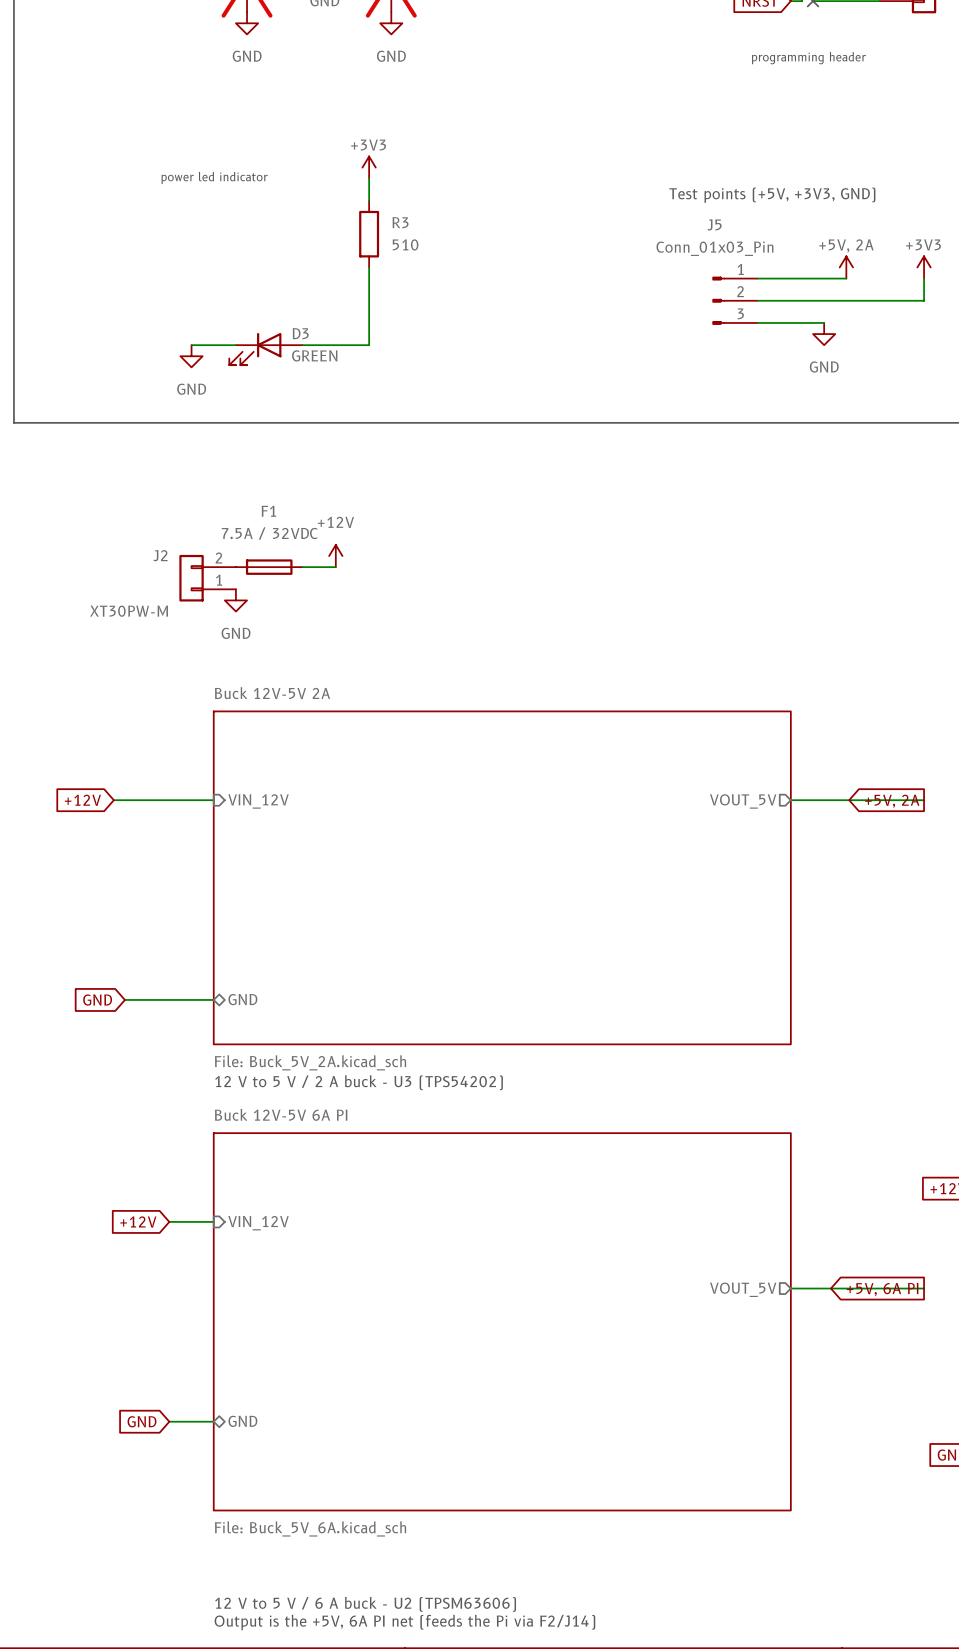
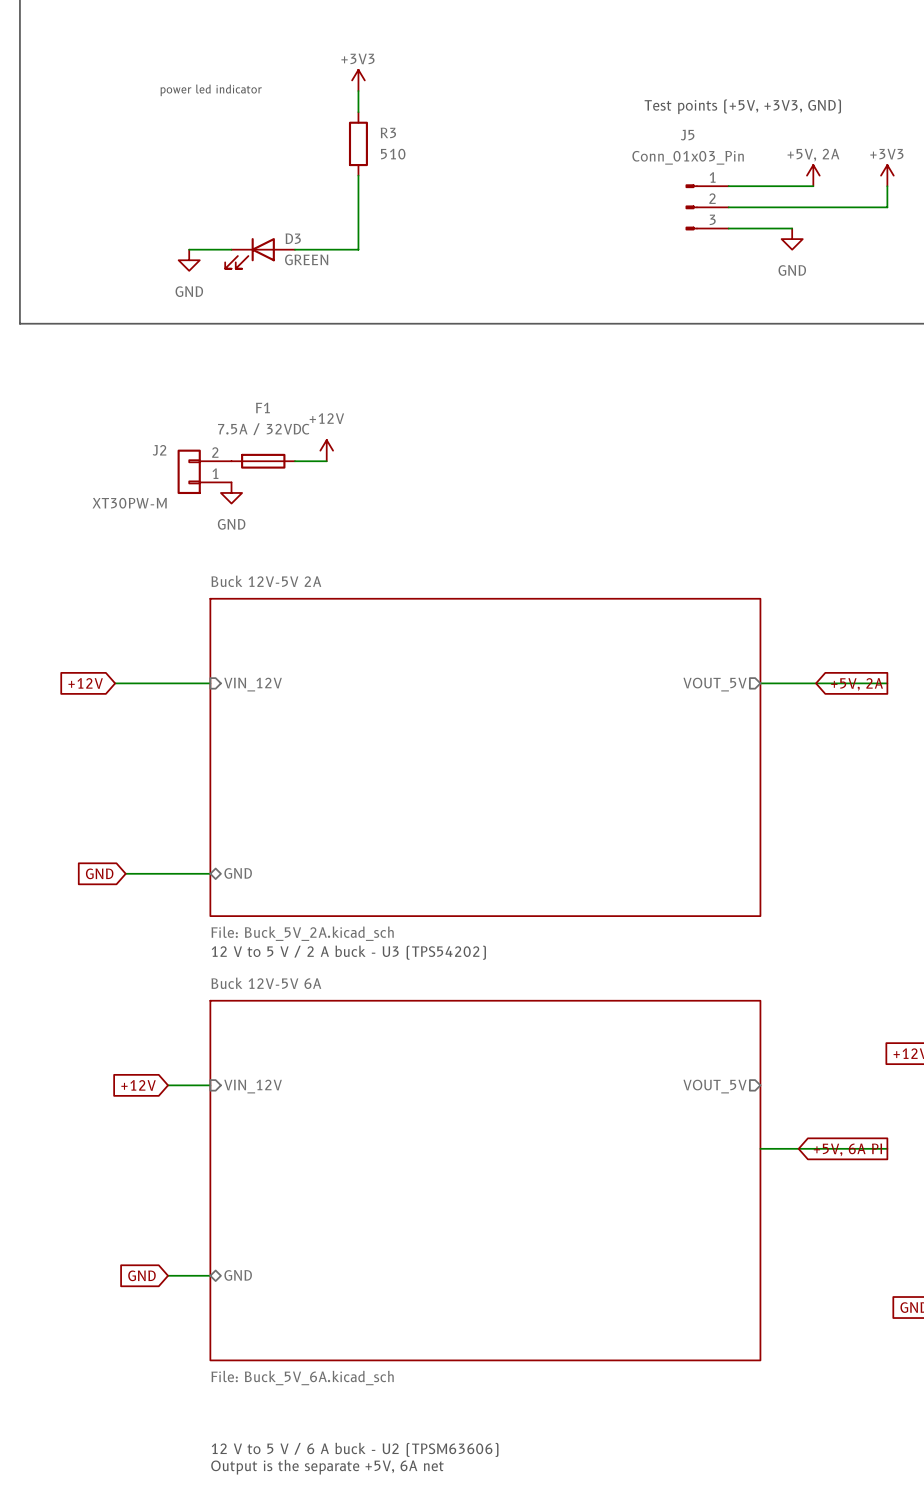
sheet Buck 12V-5V 6A PI name: Buck 12V-5V 6A PI (281, 1114) -> Buck 12V-5V 6A (266, 983)
sheet pin position: VOUT_5V (743, 1289) -> VOUT_5V (715, 1086)
text: Output is the +5V, 6A PI net (feeds the Pi via F2/J14) (404, 1622) -> Output is the separate +5V, 6A net (327, 1467)

